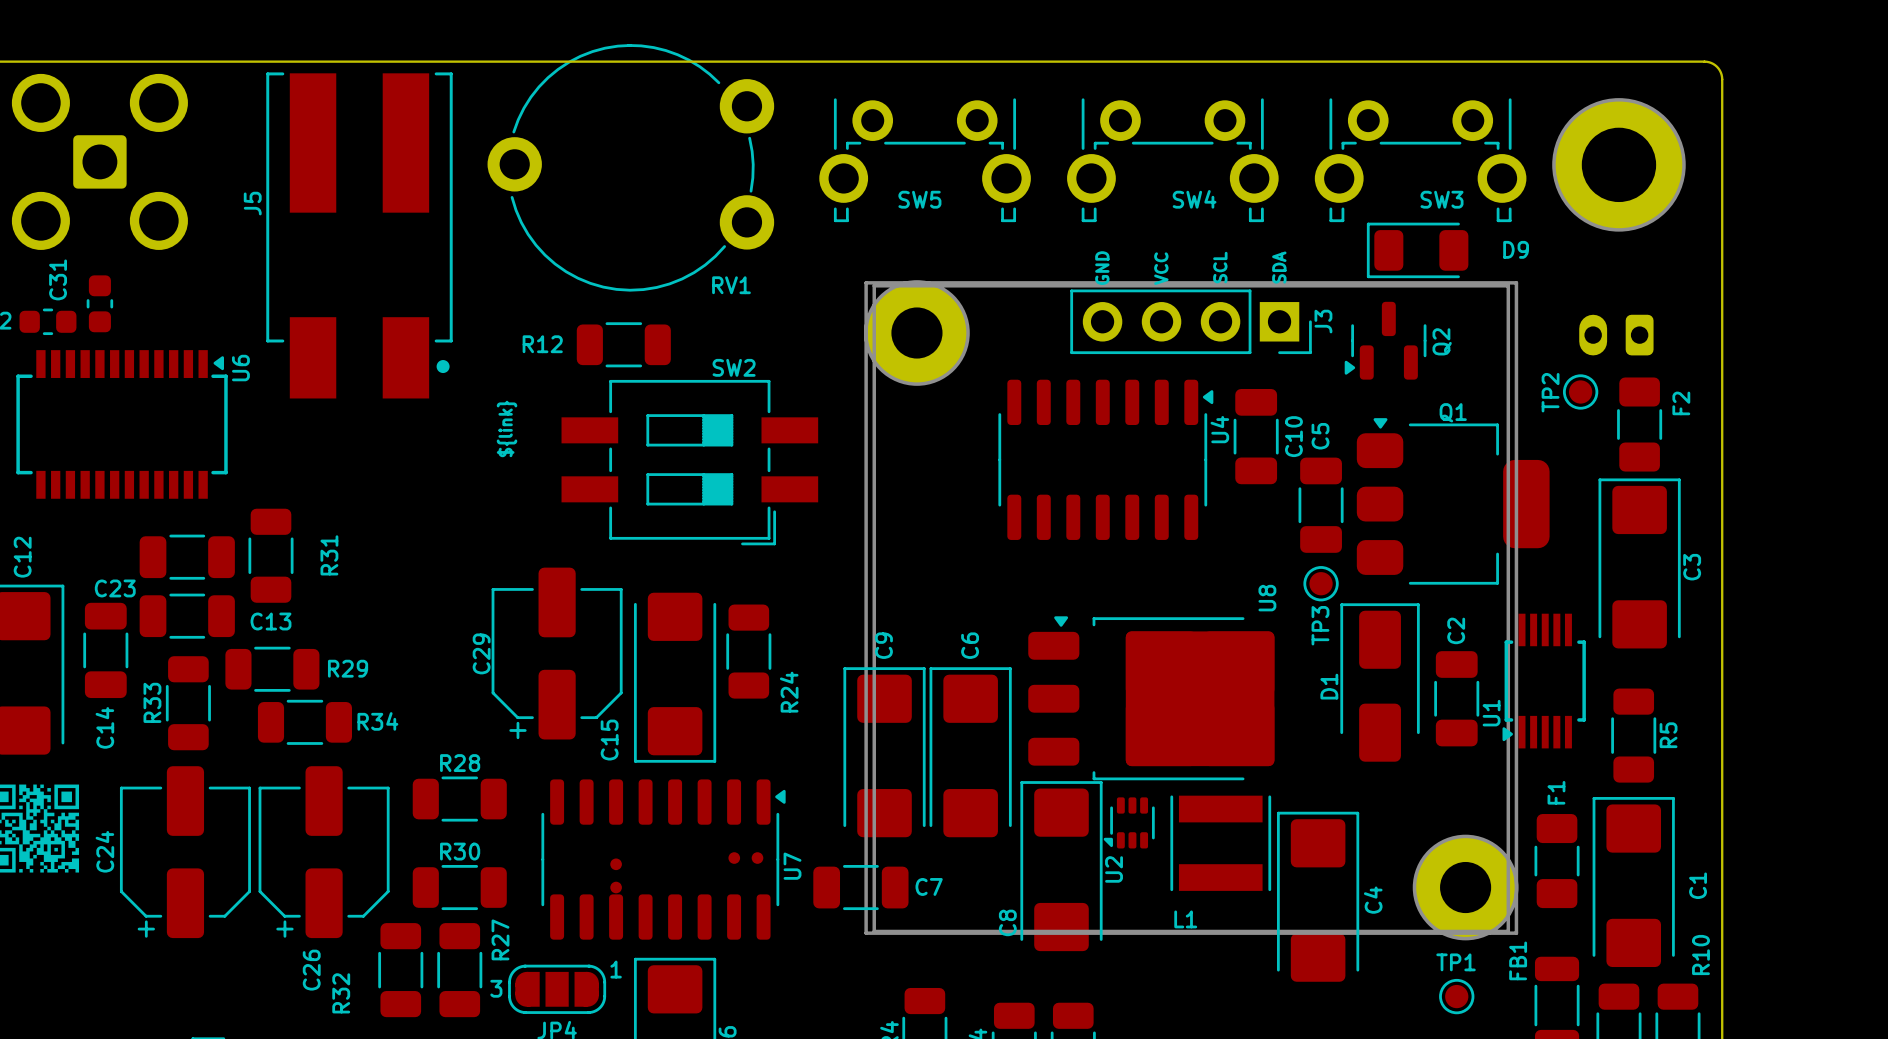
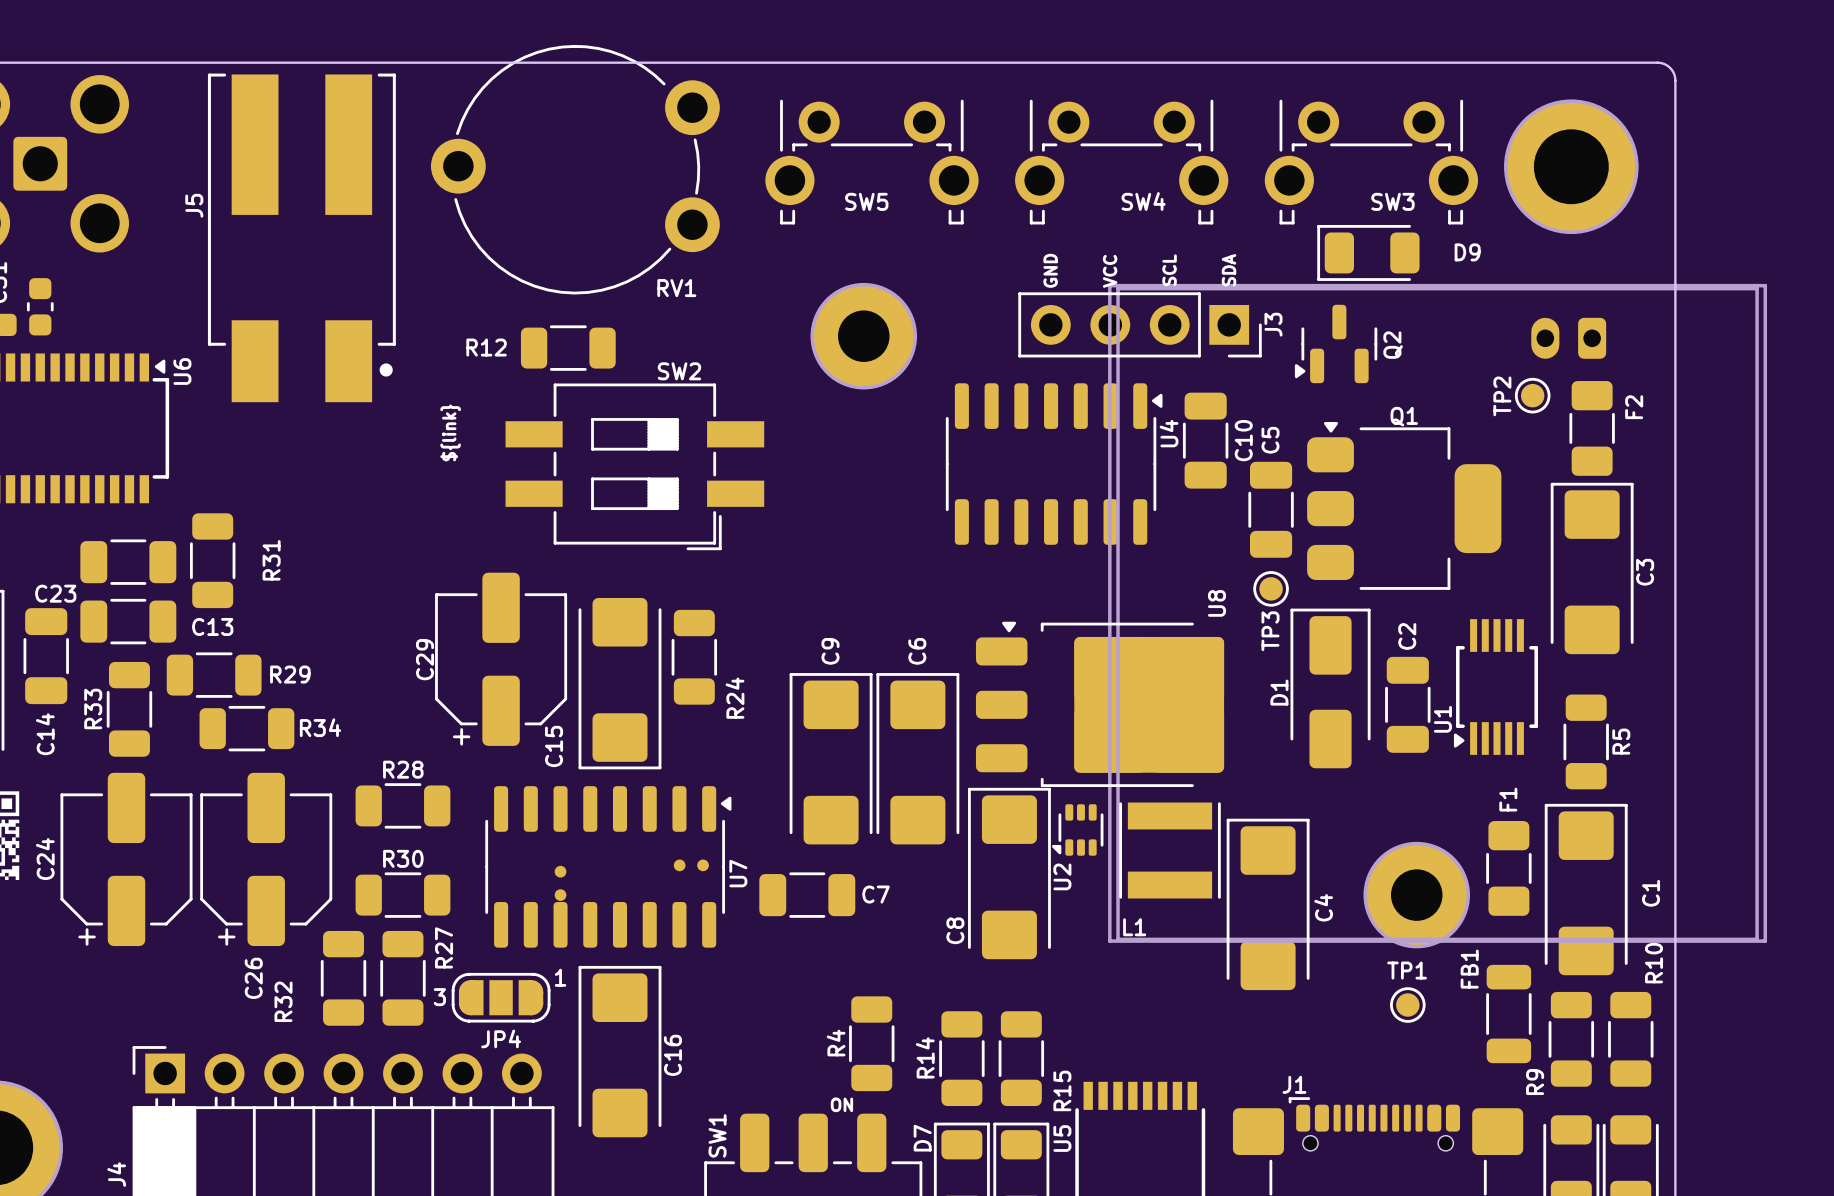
line: (1161, 282) (866, 282) (866, 933) (1161, 933) -> (1109, 285) (1109, 941)
line: (1516, 282) (1516, 933) -> (1467, 285) (1765, 285) (1765, 941) (1467, 941)
line: (1169, 285) (874, 285) (874, 931) (1169, 931) -> (1118, 288) (1118, 939)
line: (1508, 285) (1508, 931) -> (1459, 288) (1757, 288) (1757, 939) (1459, 939)

